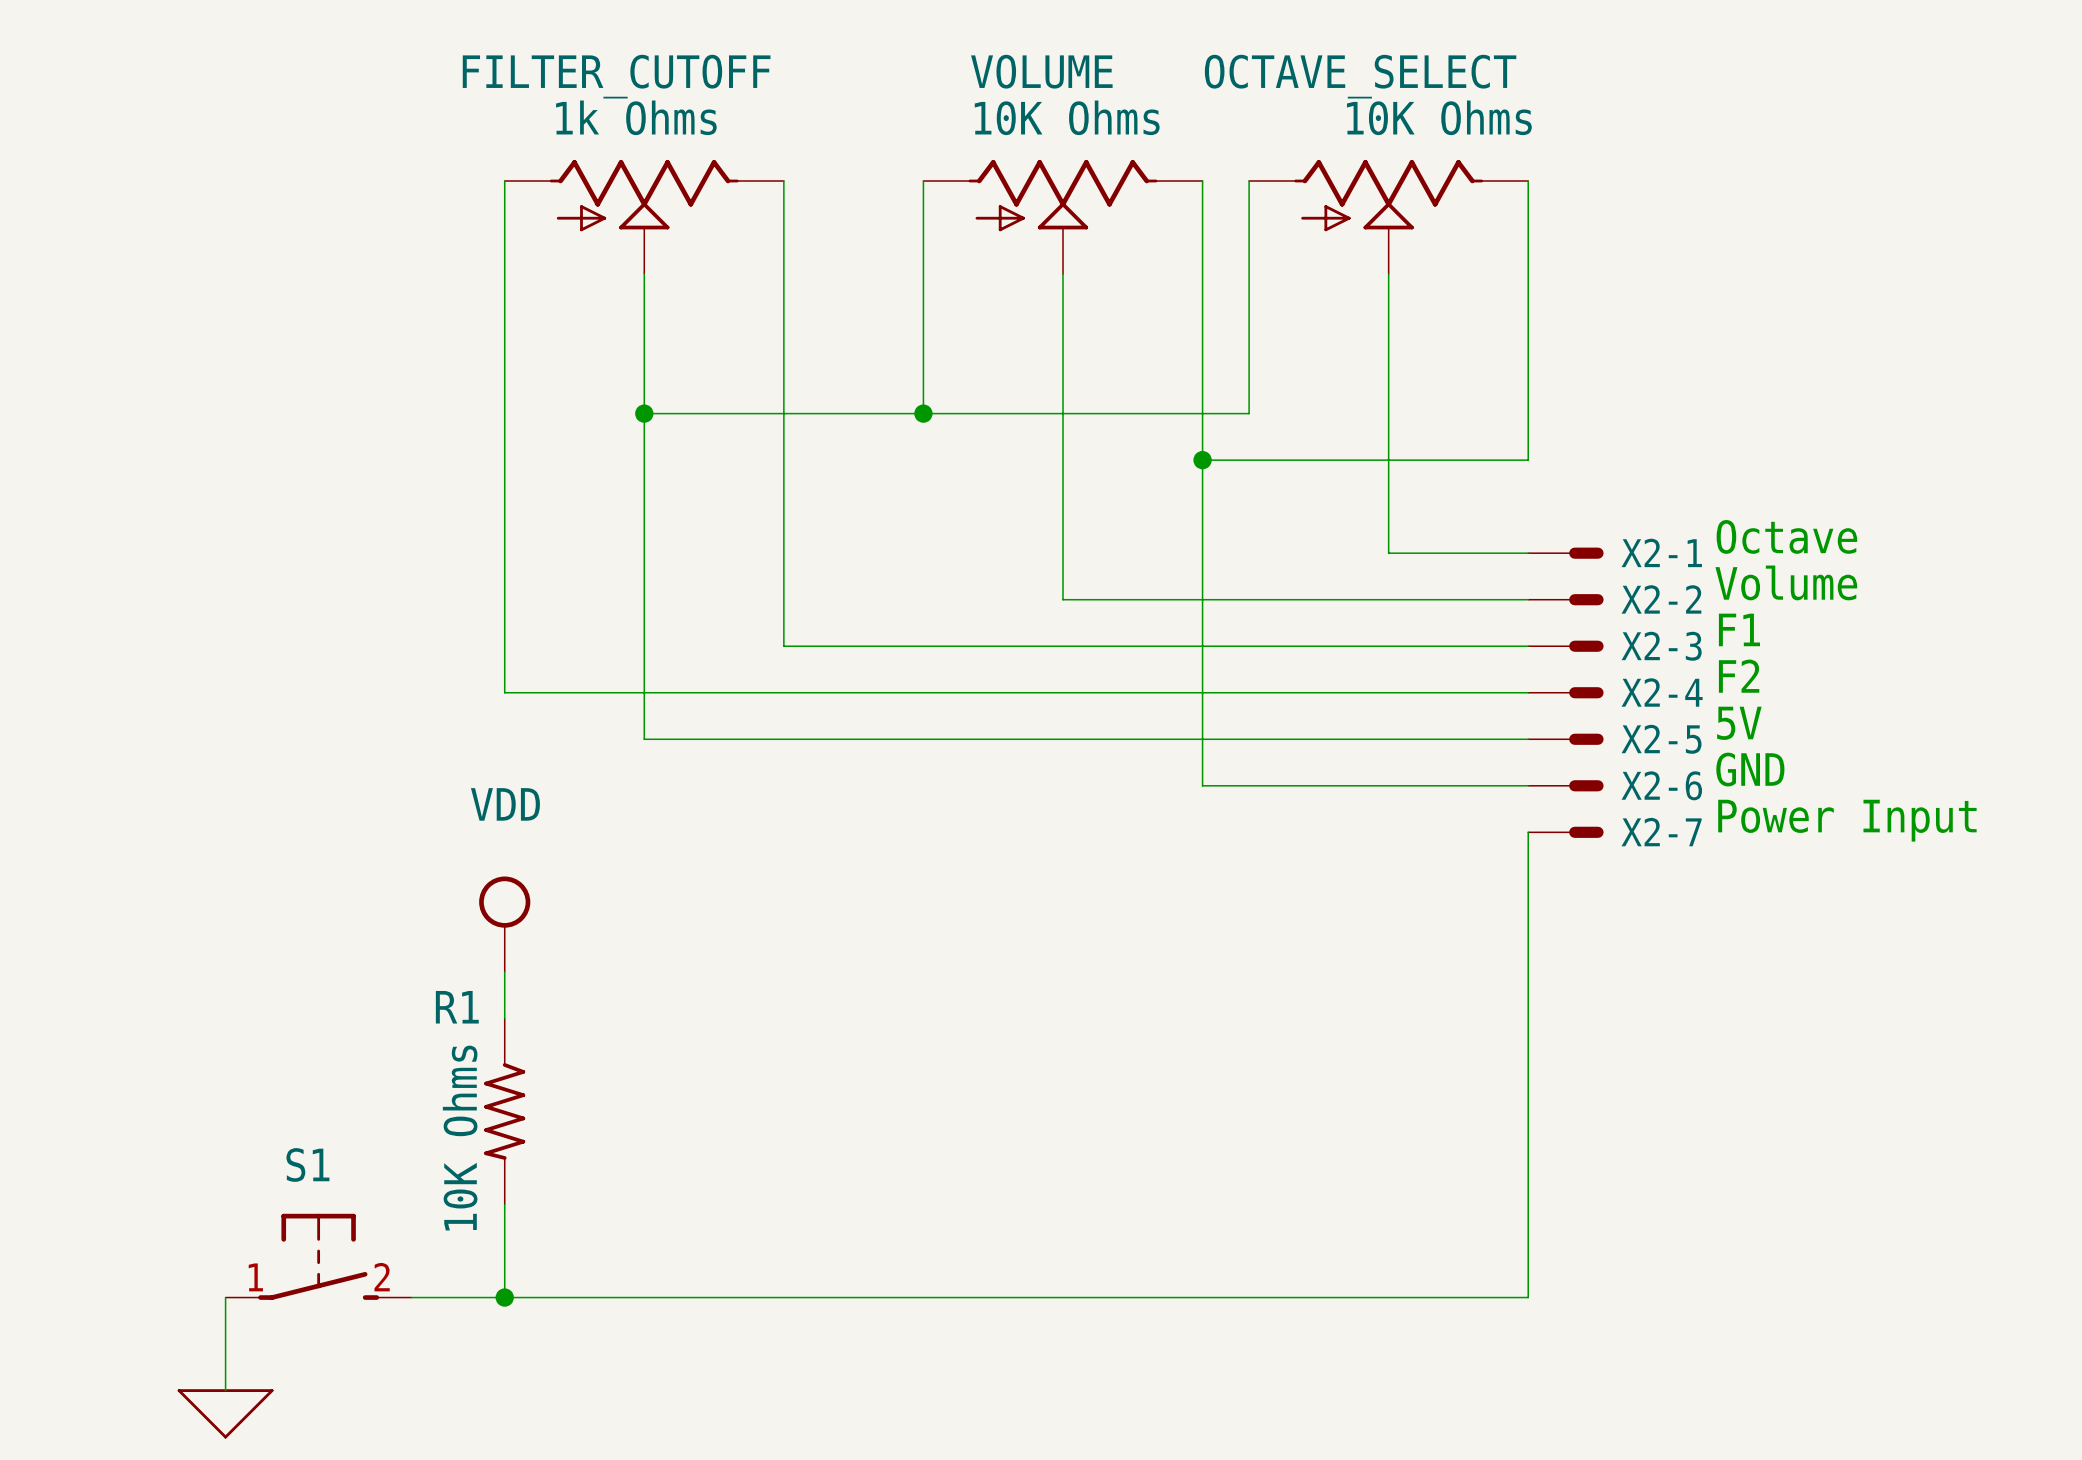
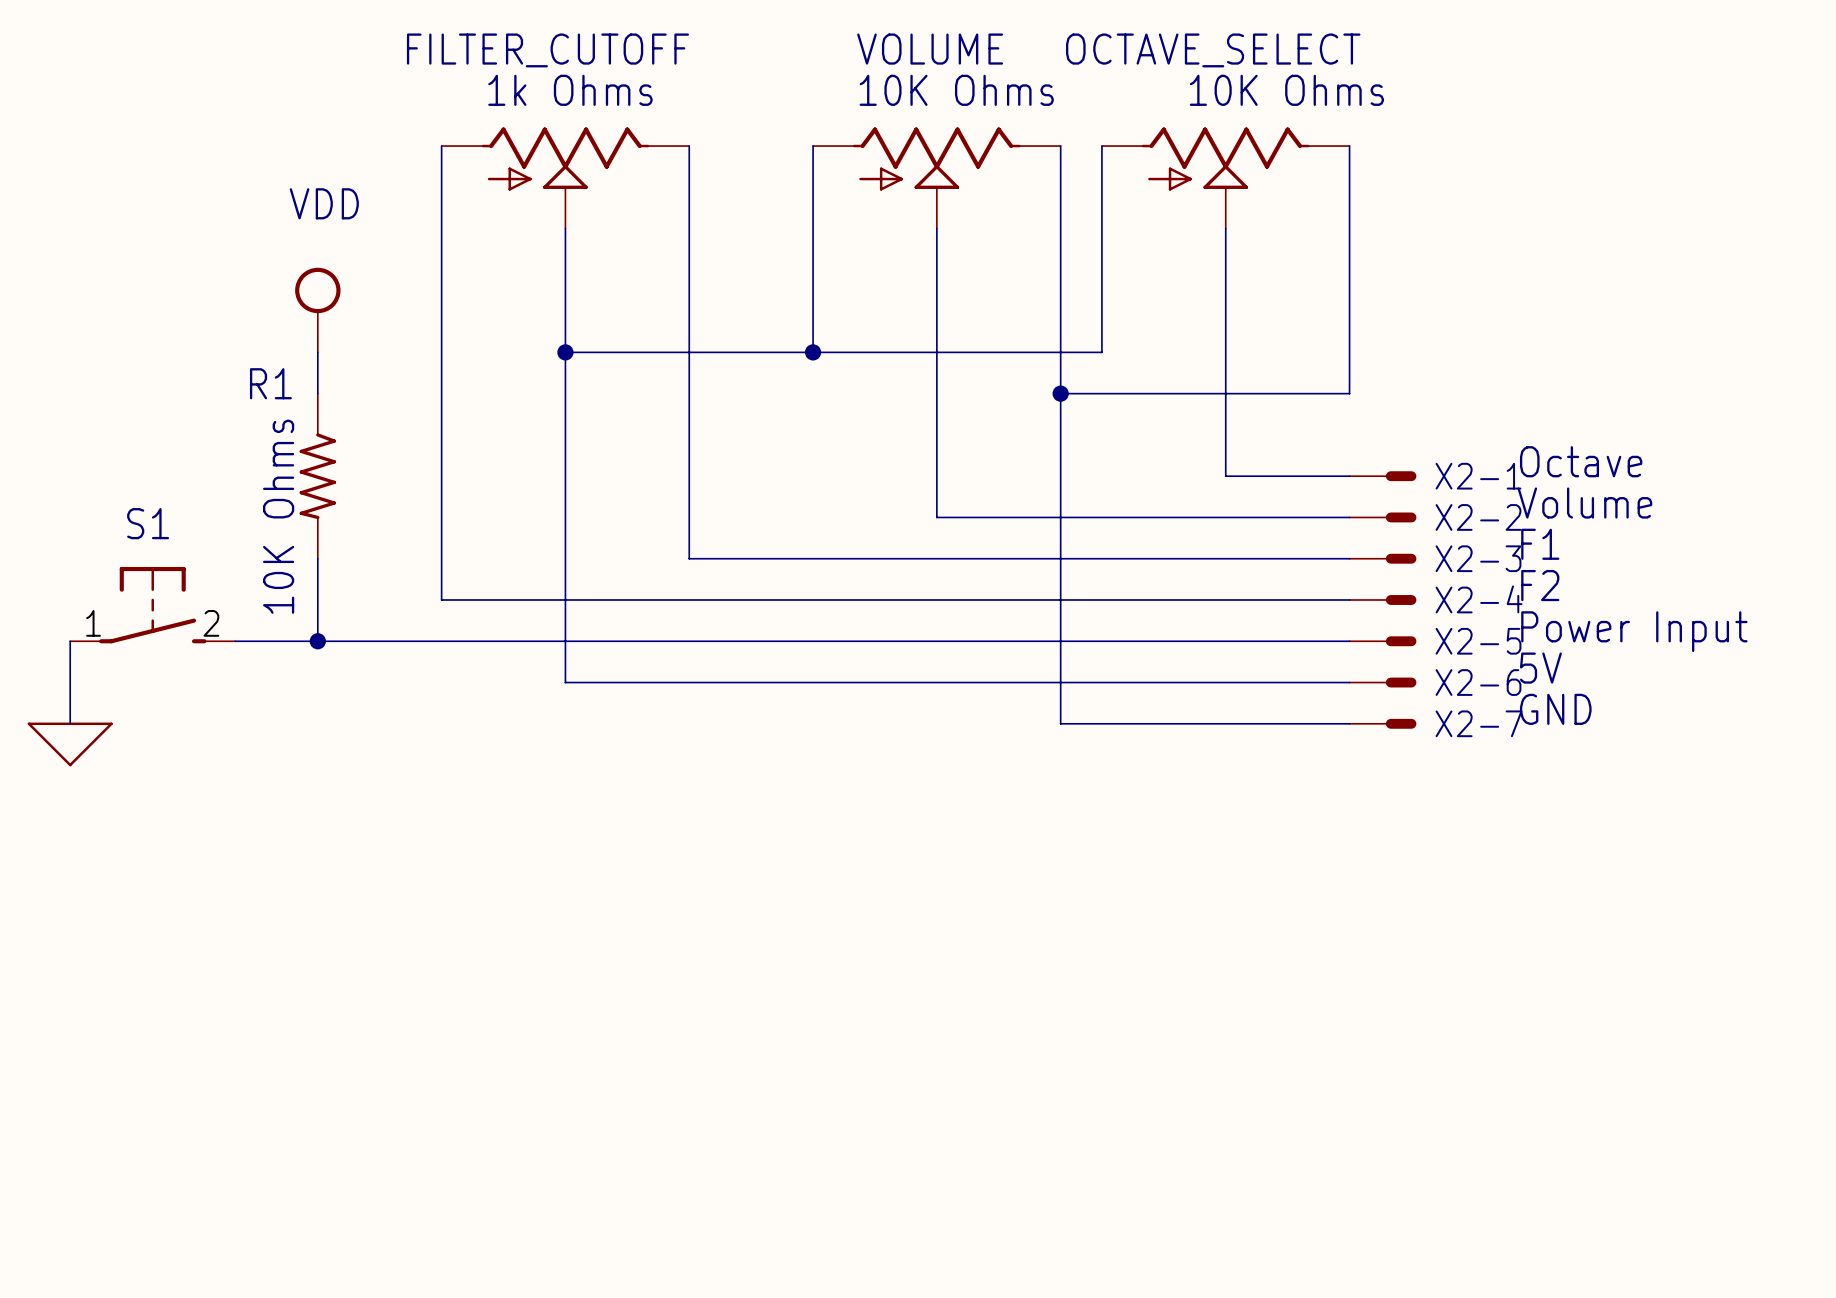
power symbol: none -> VDD (317, 310)
wire: none -> (317, 352) (317, 393)
wire: none -> (317, 558) (317, 641)
text: 5V (1739, 723) -> Power Input (1634, 631)
wire: none -> (70, 641) (70, 723)
junction: none -> (317, 641)
text: GND (1750, 769) -> 5V (1540, 668)
text: Power Input (1847, 820) -> GND (1555, 709)
wire: (1528, 832) (1528, 1297) (411, 1297) -> (1349, 723) (1060, 723) (1060, 682) (565, 682) (565, 641) (235, 641)
power symbol: none -> (70, 744)
power symbol: VDD (504, 924) -> none
wire: (504, 971) (504, 1018) -> none
R1 position: (504, 1111) -> (317, 476)
wire: (504, 1204) (504, 1297) -> none
S1 position: (318, 1256) -> (152, 605)
wire: (225, 1297) (225, 1390) -> none
junction: (504, 1297) -> none
power symbol: (225, 1413) -> none

